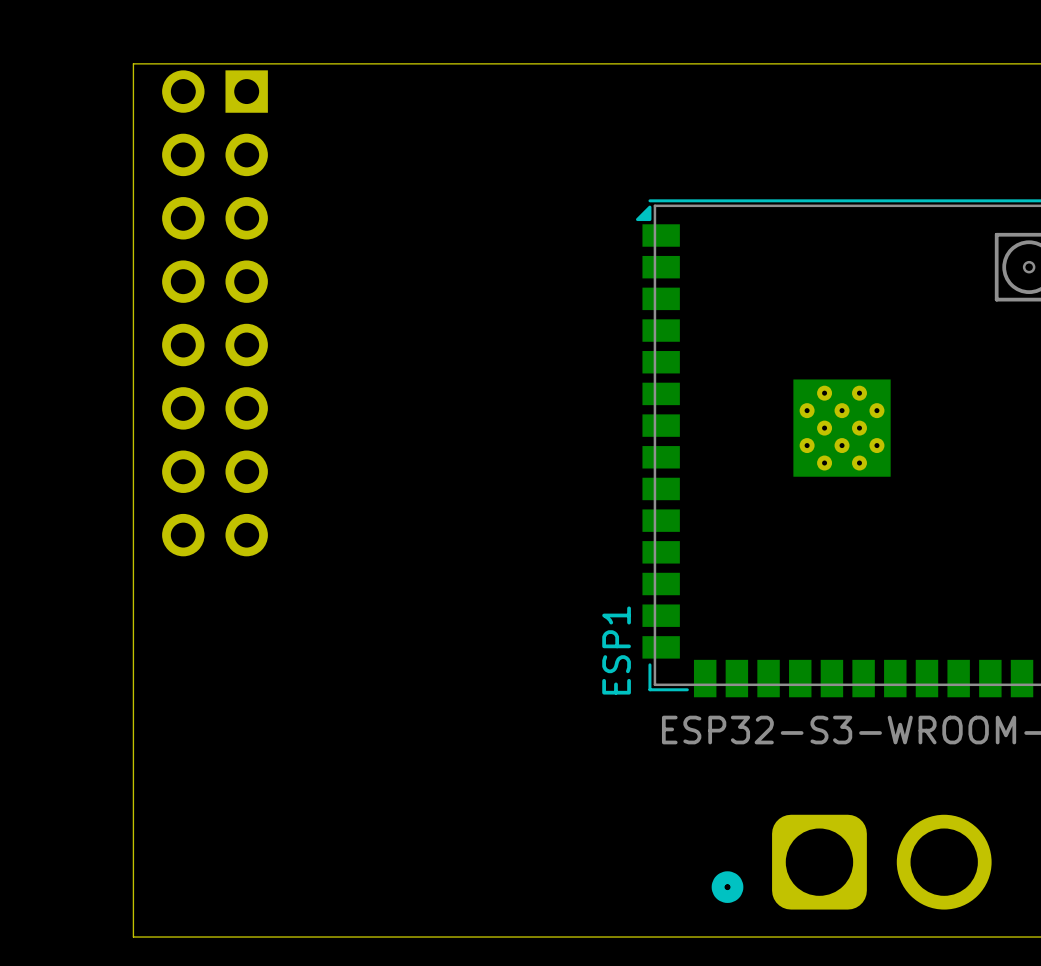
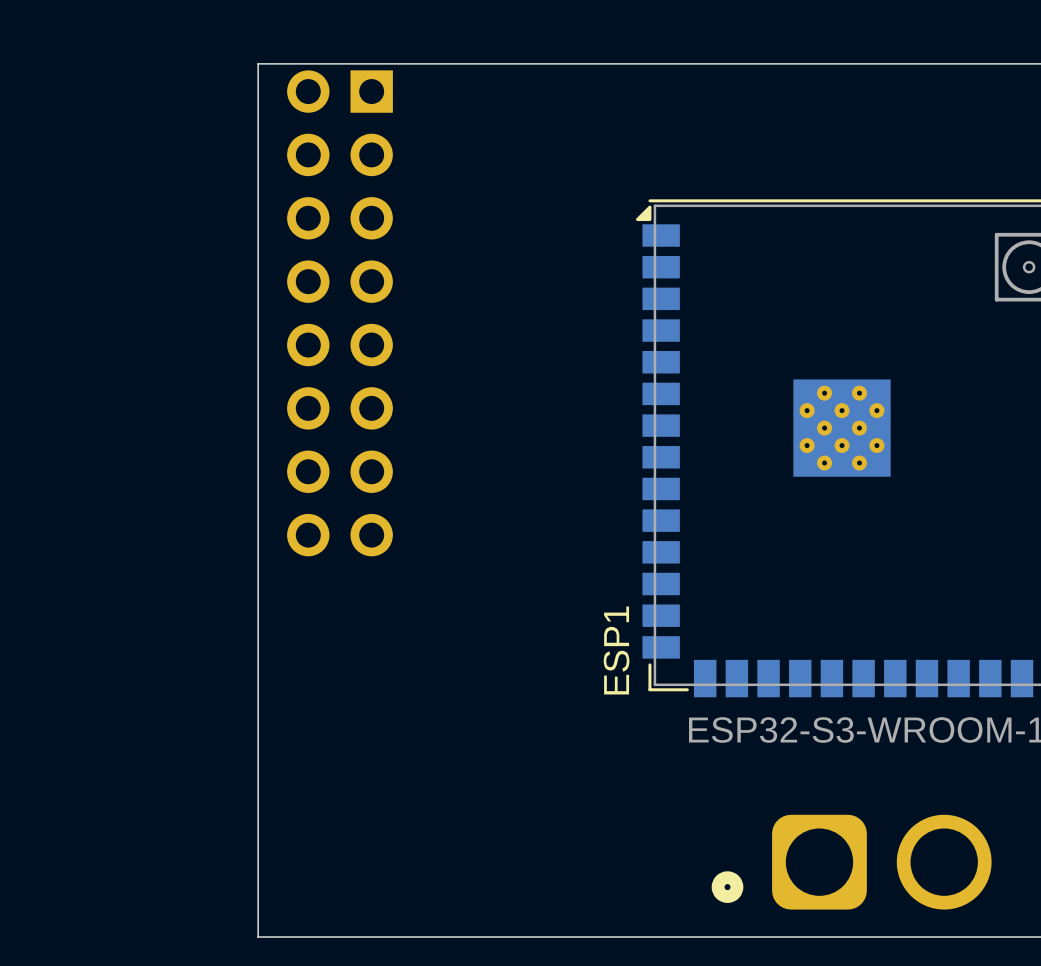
board edge: (258, 63) (133, 63) (133, 937) (258, 937) -> (258, 63) (258, 937)
part position: (215, 313) -> (339, 313)

